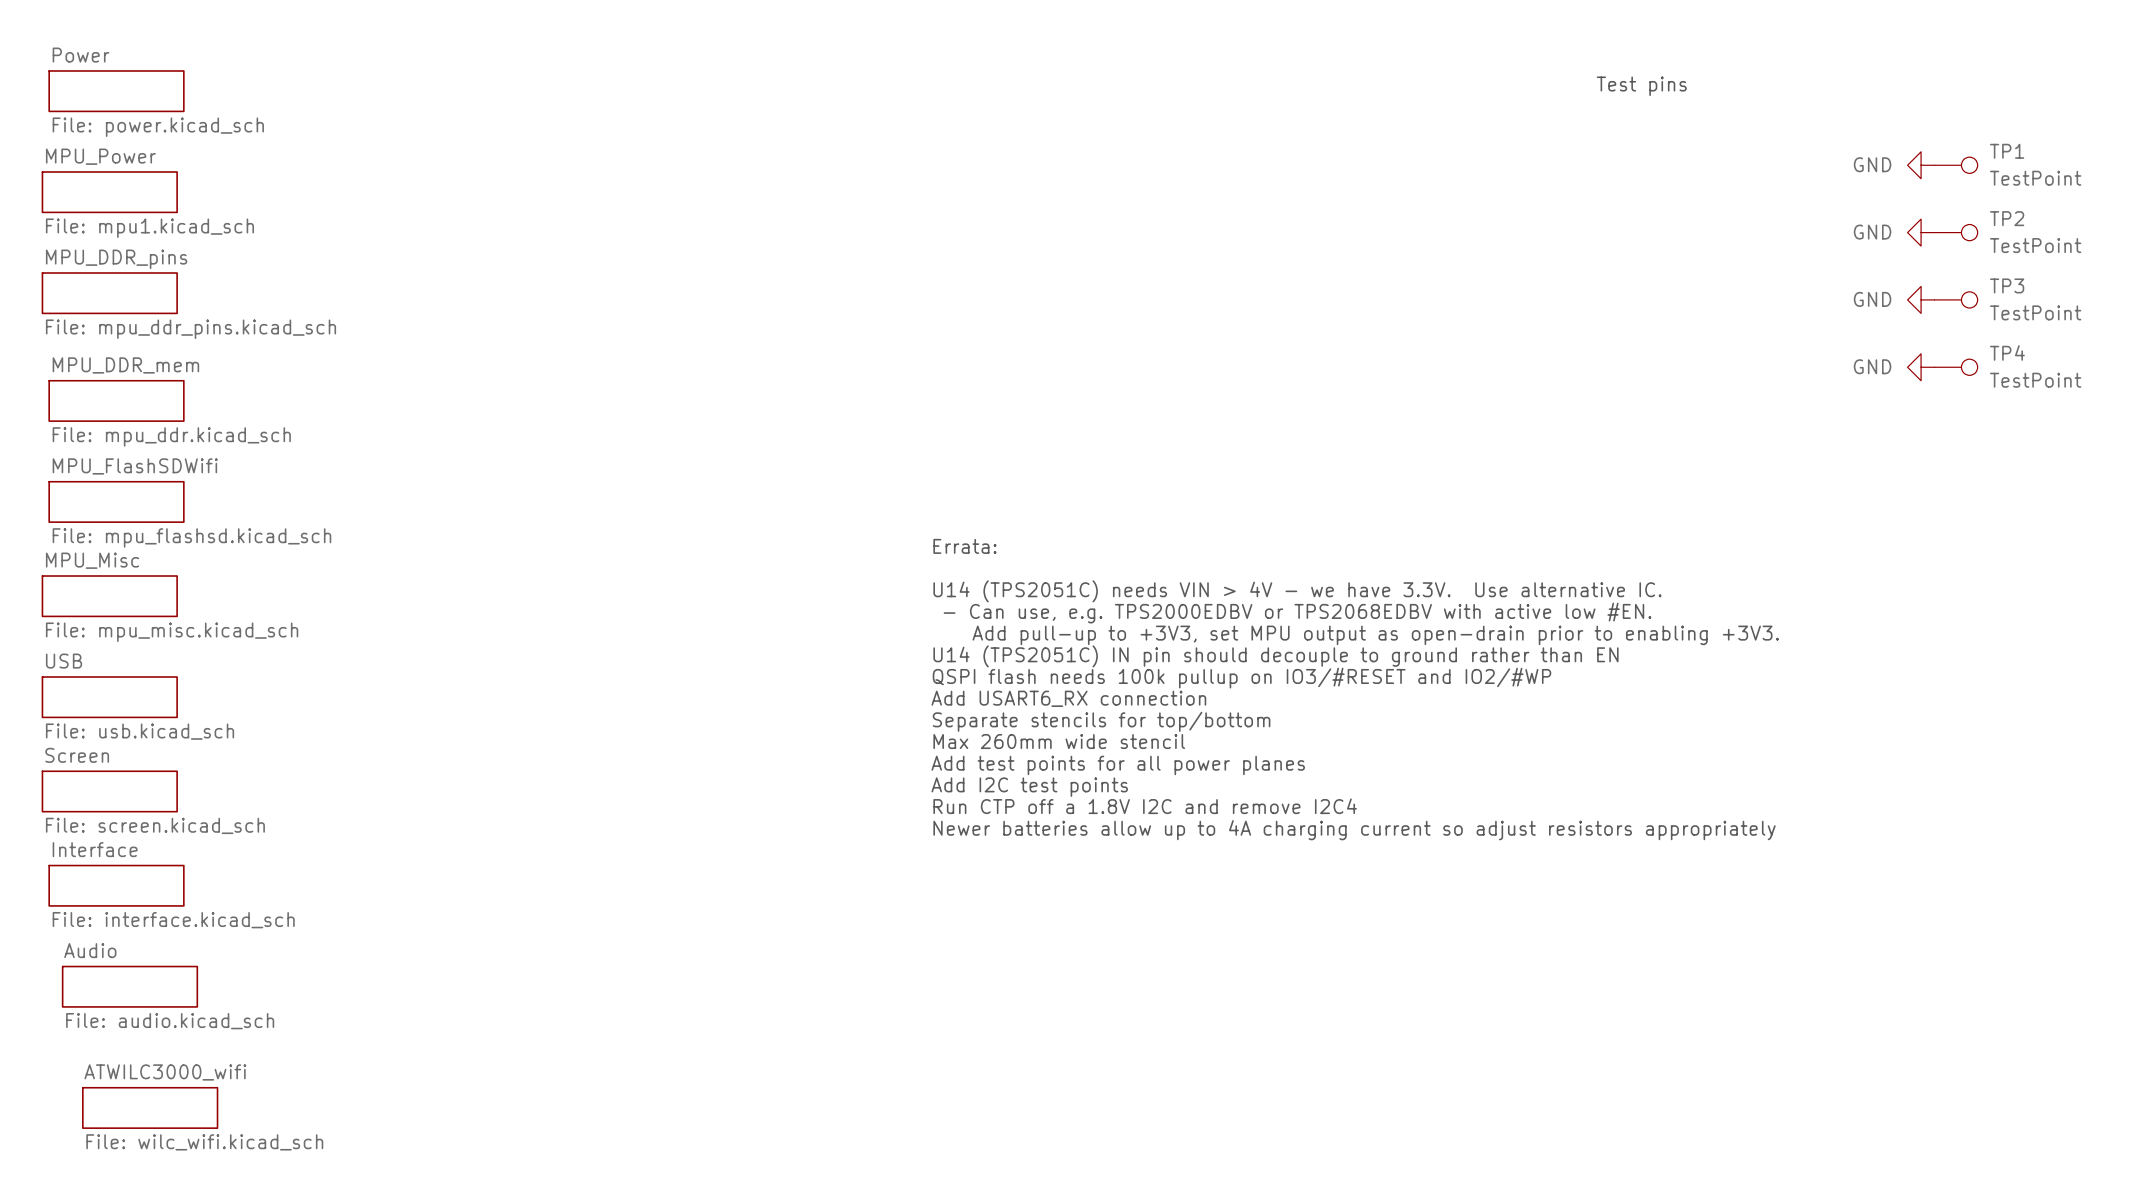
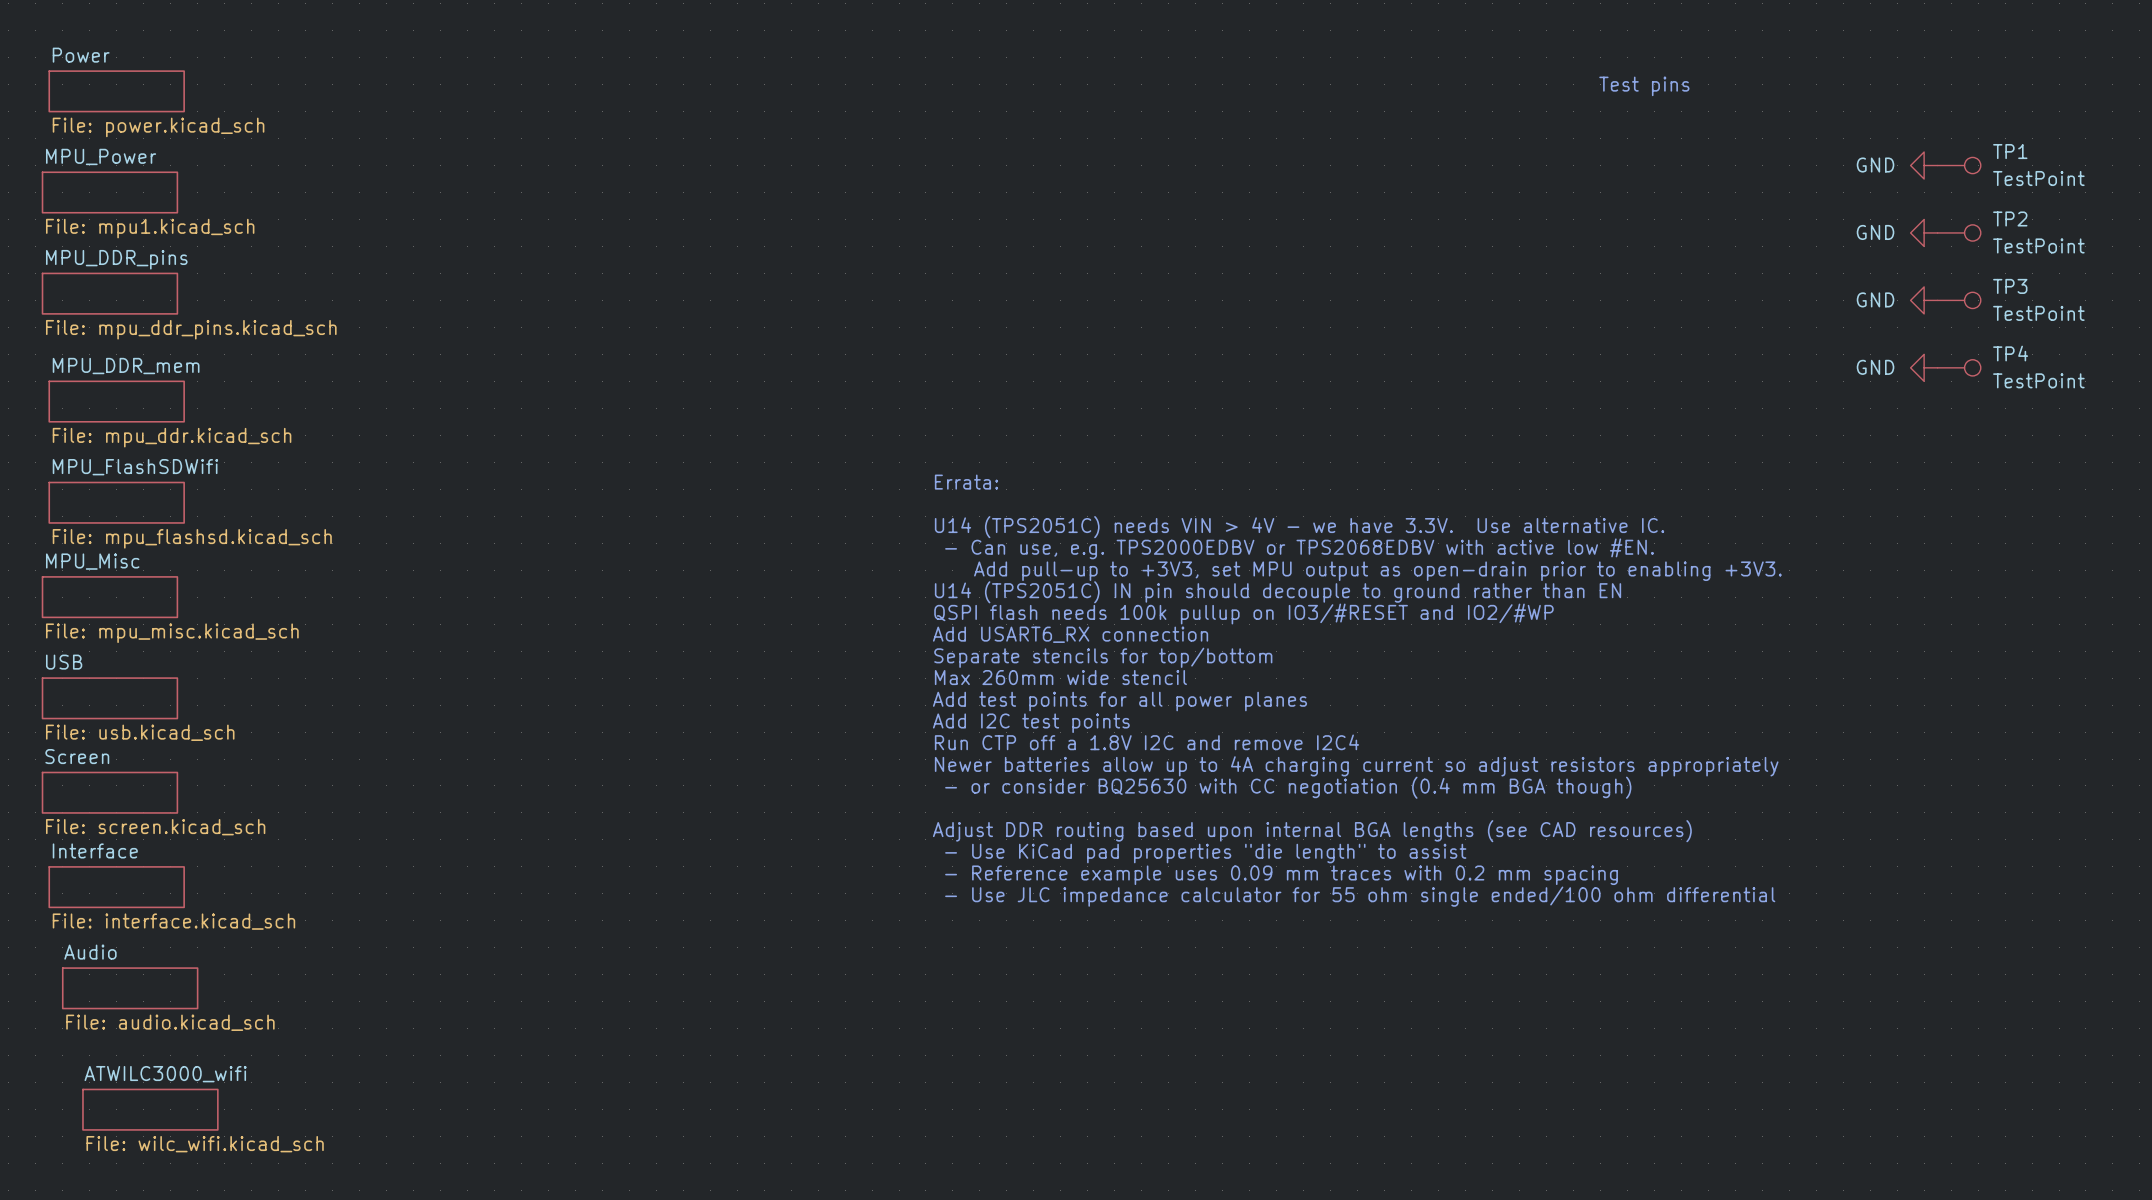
text: none -> Errata: (966, 482)
text: none -> U14 (TPS2051C) needs VIN > 4V - we have 3.3V. Use alternative IC. (1299, 527)
text: Errata: (964, 546) -> - Can use, e.g. TPS2000EDBV or TPS2068EDBV with active low #EN. (1299, 548)
text: none -> Add pull-up to +3V3, set MPU output as open-drain prior to enabling +3V3. (1377, 571)
text: U14 (TPS2051C) needs VIN > 4V - we have 3.3V. Use alternative IC. (1297, 591) -> U14 (TPS2051C) IN pin should decouple to ground rather than EN (1278, 592)
text: - Can use, e.g. TPS2000EDBV or TPS2068EDBV with active low #EN. (1297, 613) -> QSPI flash needs 100k pullup on IO3/#RESET and IO2/#WP (1243, 614)
text: Add pull-up to +3V3, set MPU output as open-drain prior to enabling +3V3. (1375, 635) -> Add USART6_RX connection (1070, 634)
text: U14 (TPS2051C) IN pin should decouple to ground rather than EN (1275, 656) -> Separate stencils for top/bottom (1103, 657)
text: QSPI flash needs 100k pullup on IO3/#RESET and IO2/#WP (1241, 678) -> Max 260mm wide stencil (1060, 677)
text: Add USART6_RX connection (1068, 698) -> Add test points for all power planes (1120, 701)
text: Separate stencils for top/bottom (1101, 721) -> Add I2C test points (1031, 723)
text: Max 260mm wide stencil (1059, 741) -> Run CTP off a 1.8V I2C and remove I2C4 (1146, 742)
text: Add test points for all power planes (1118, 765) -> Newer batteries allow up to 4A charging current so adjust resistors appropriately (1356, 766)
text: Add I2C test points (1029, 787) -> - or consider BQ25630 with CC negotiation (0.4 mm BGA though) (1288, 787)
text: Run CTP off a 1.8V I2C and remove I2C4 (1145, 806) -> none
text: Newer batteries allow up to 4A charging current so adjust resistors appropriately (1354, 830) -> Adjust DDR routing based upon internal BGA lengths (see CAD resources) (1312, 831)
text: none -> - Use KiCad pad properties "die length" to assist (1205, 853)
text: none -> - Reference example uses 0.09 mm traces with 0.2 mm spacing (1281, 875)
text: none -> - Use JLC impedance calculator for 55 ohm single ended/100 ohm differential (1360, 896)

